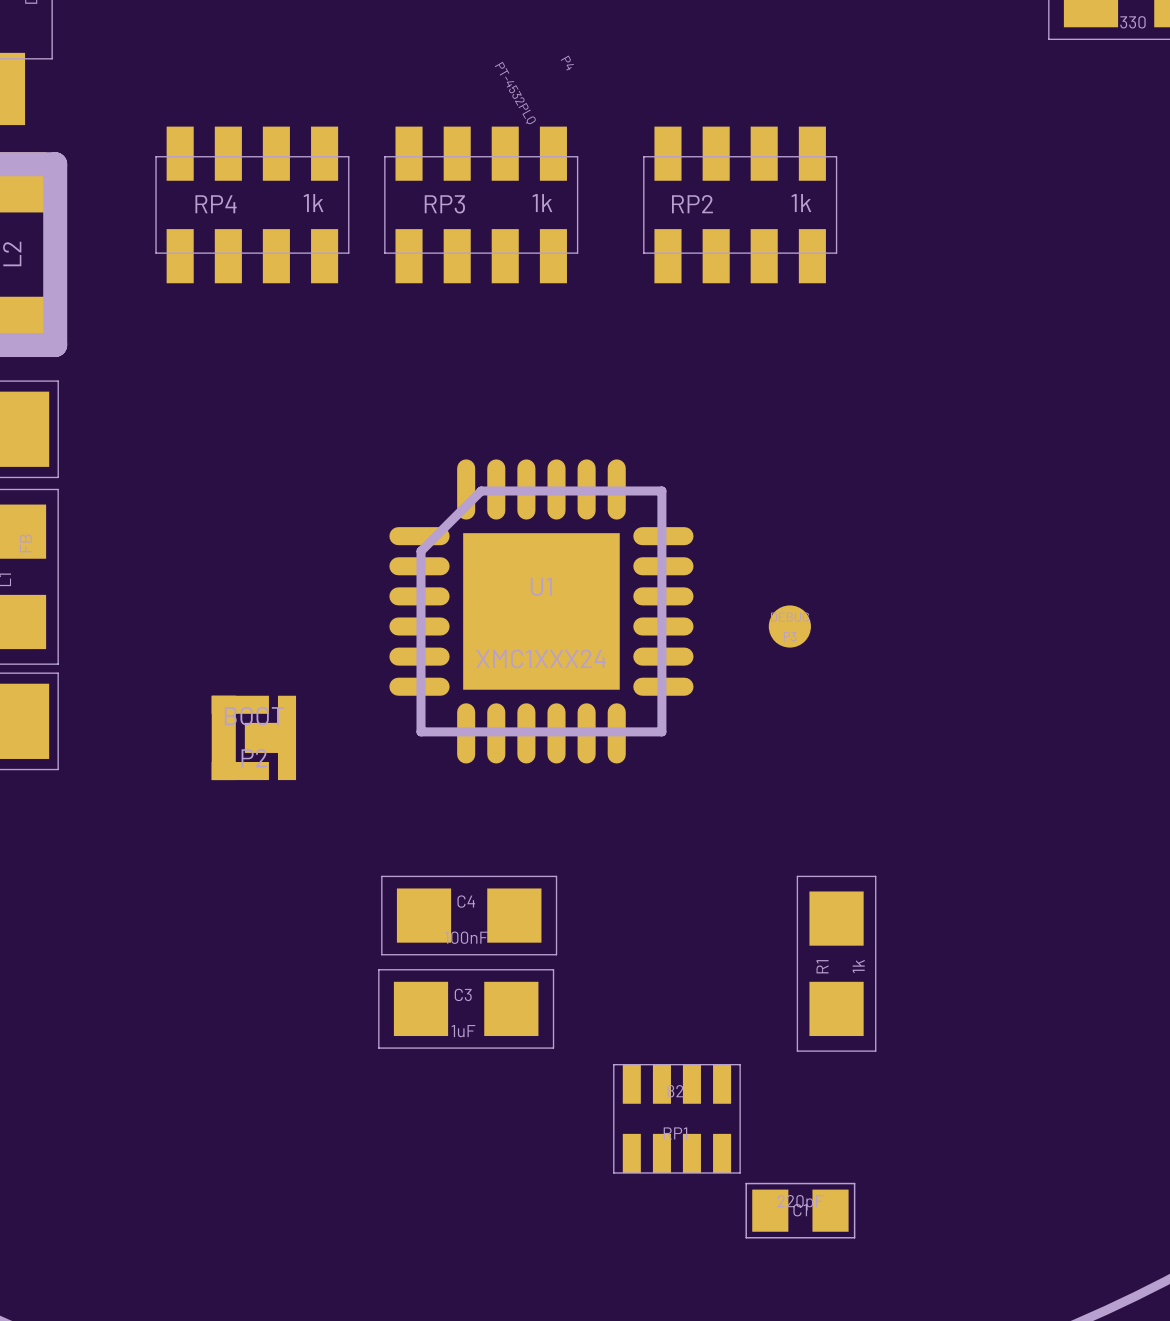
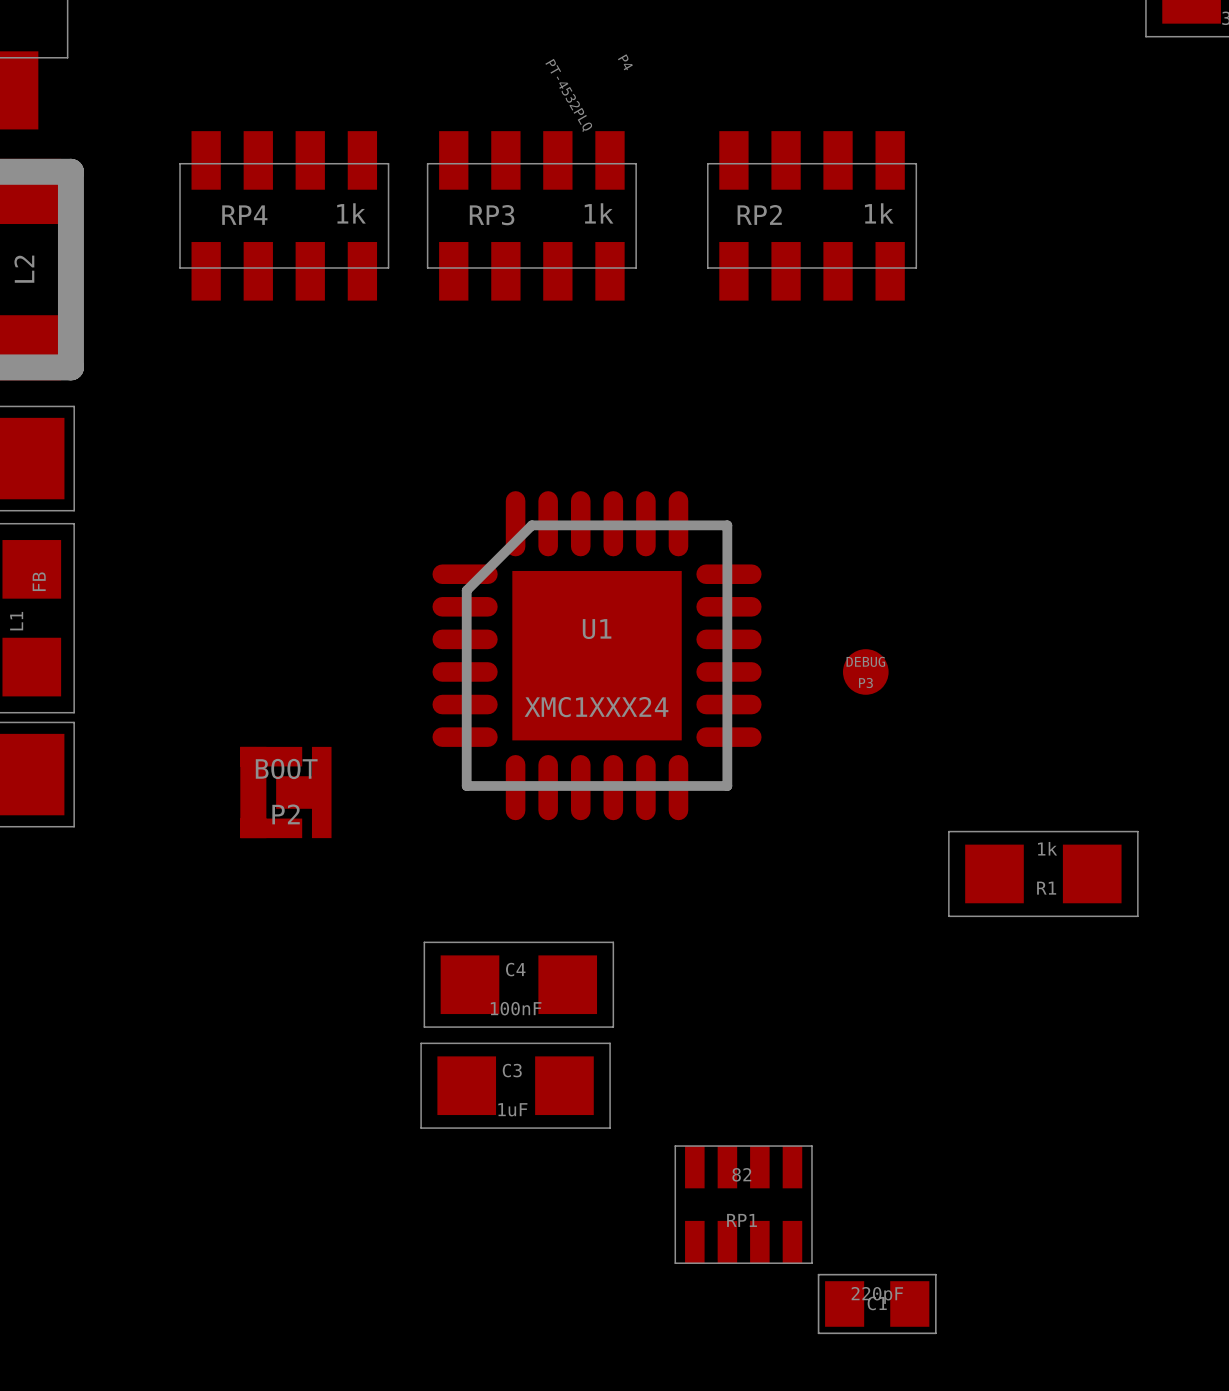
R1 rotation: 0° (836, 963) -> 90° clockwise (1043, 873)
R1 position: (836, 963) -> (1043, 873)

